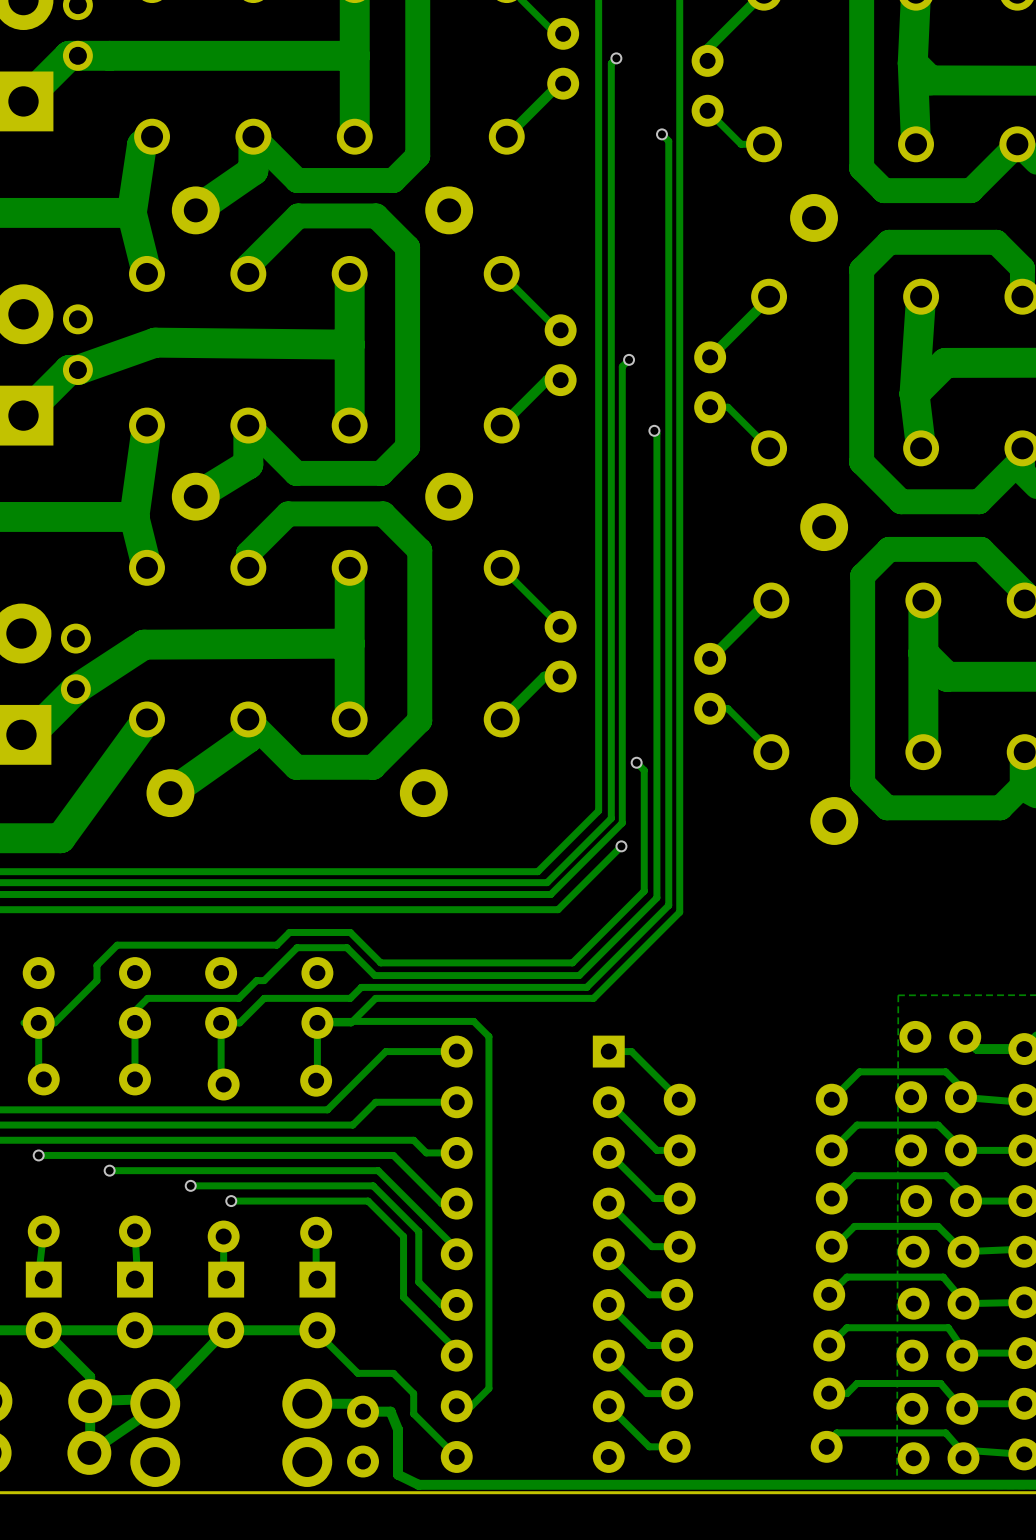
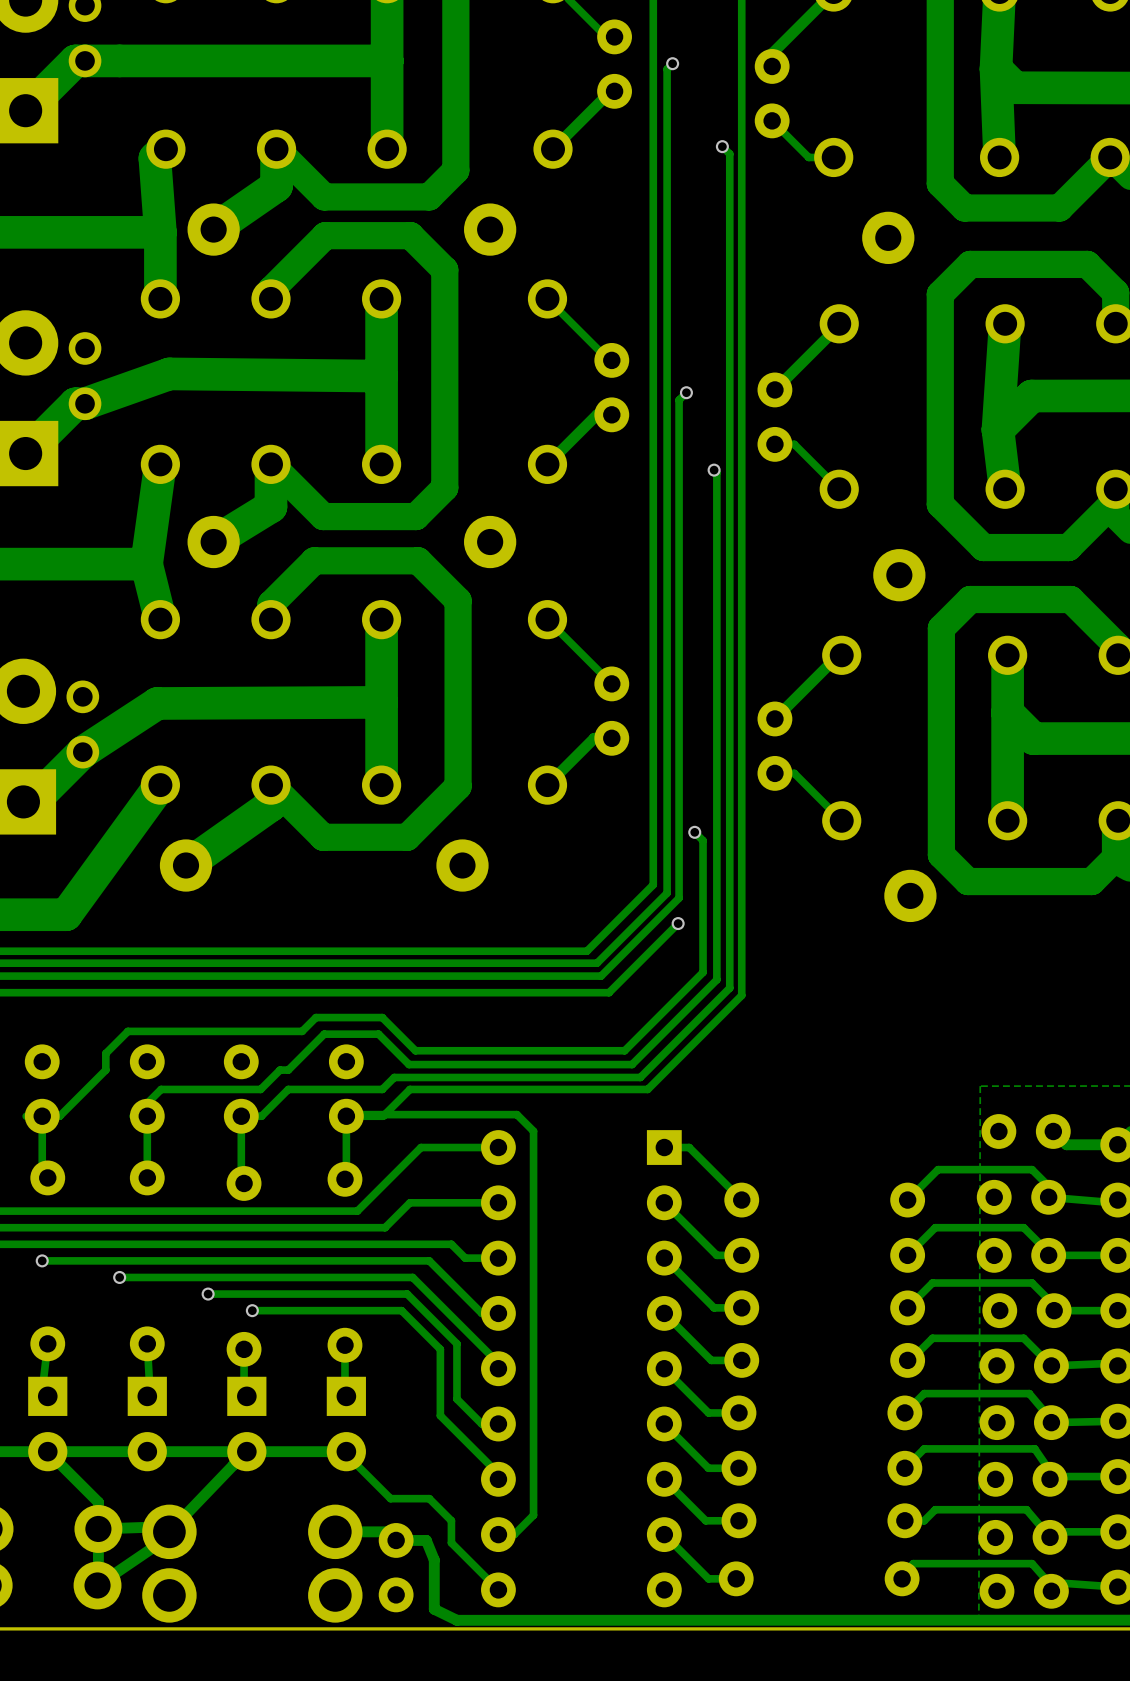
track: (141, 145) (131, 212) (146, 273) -> (154, 158) (160, 232) (160, 298)

